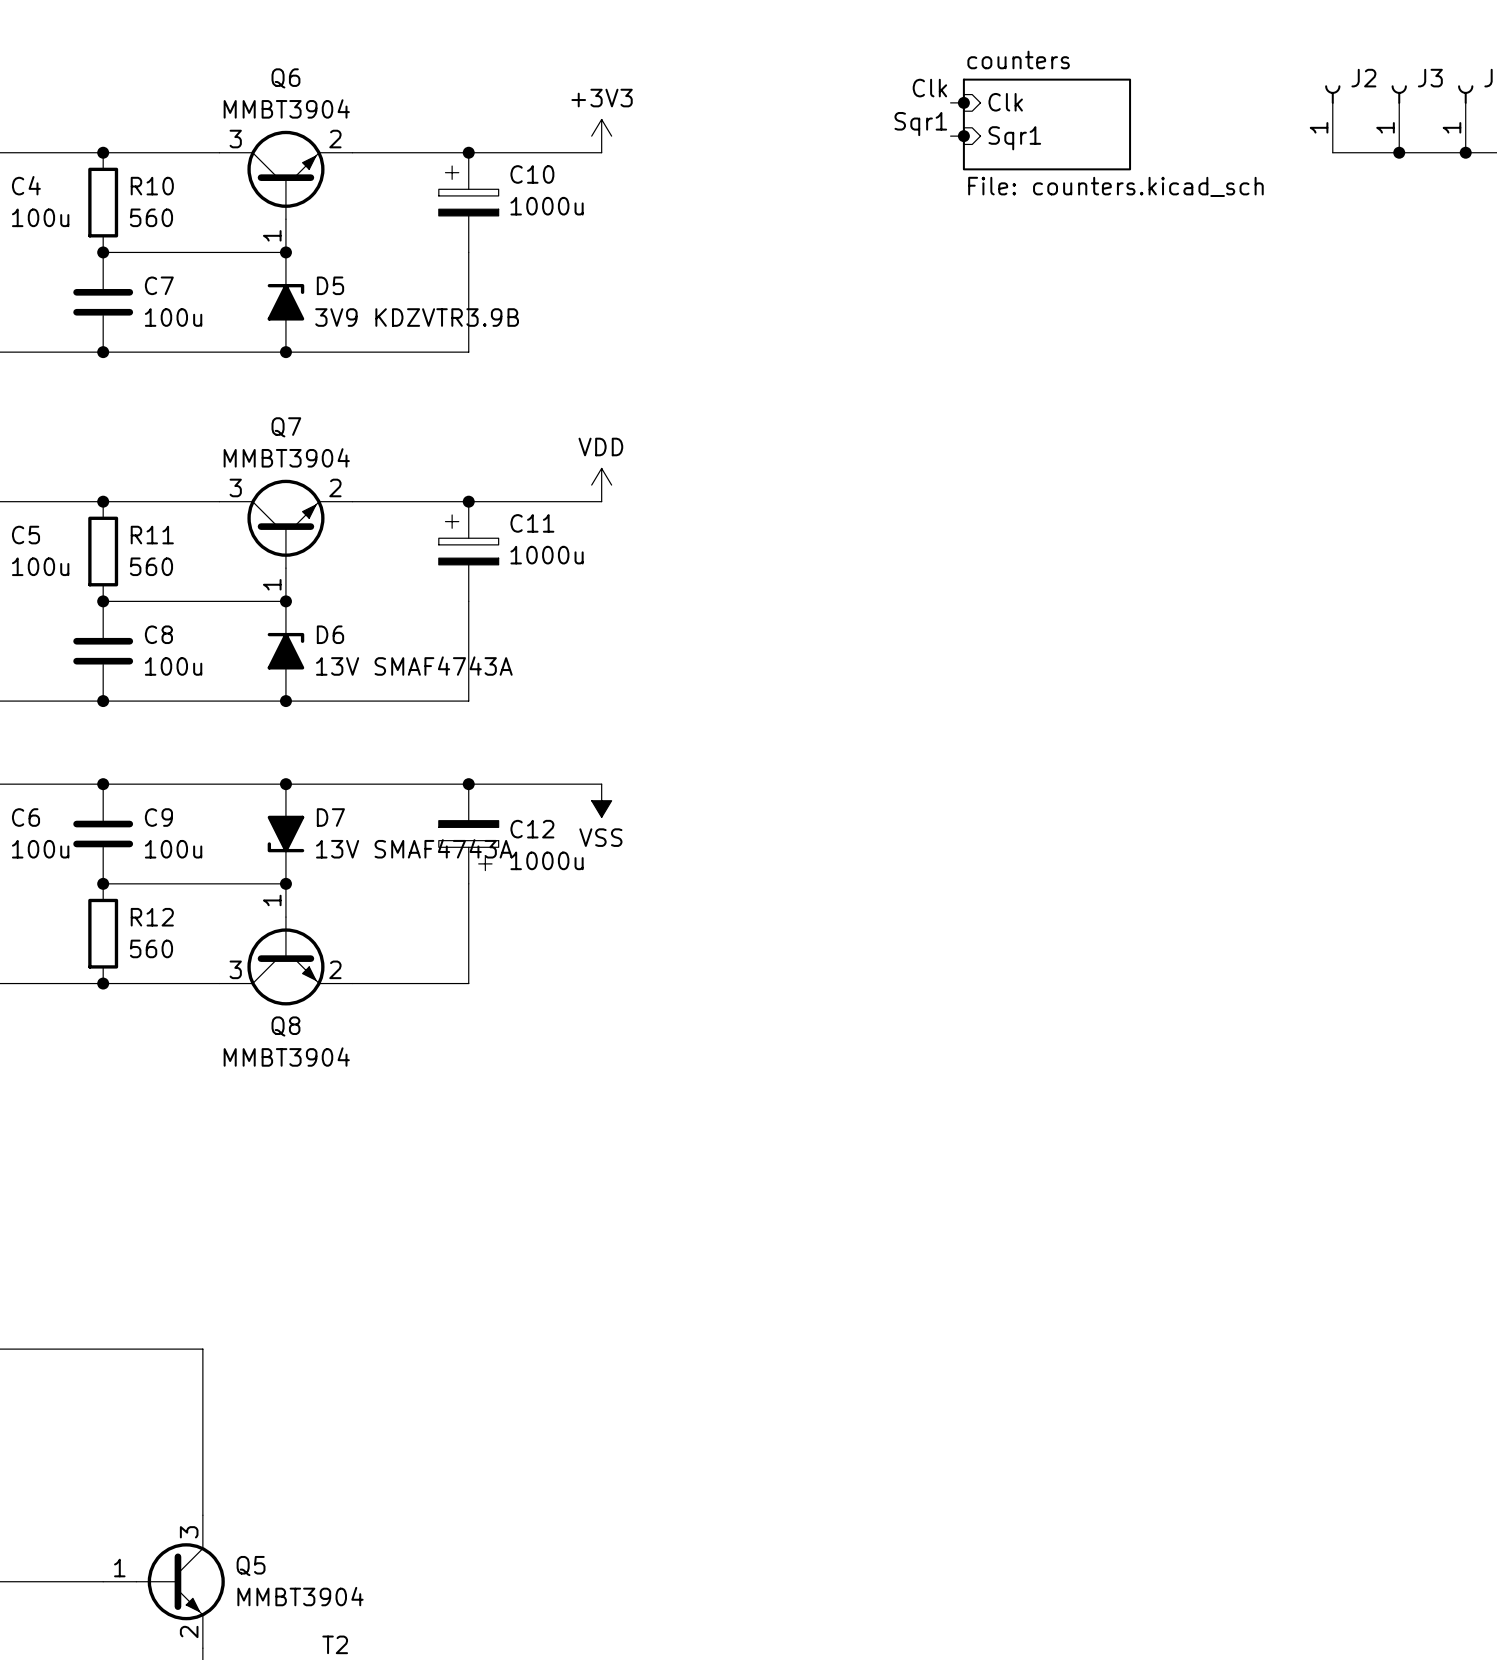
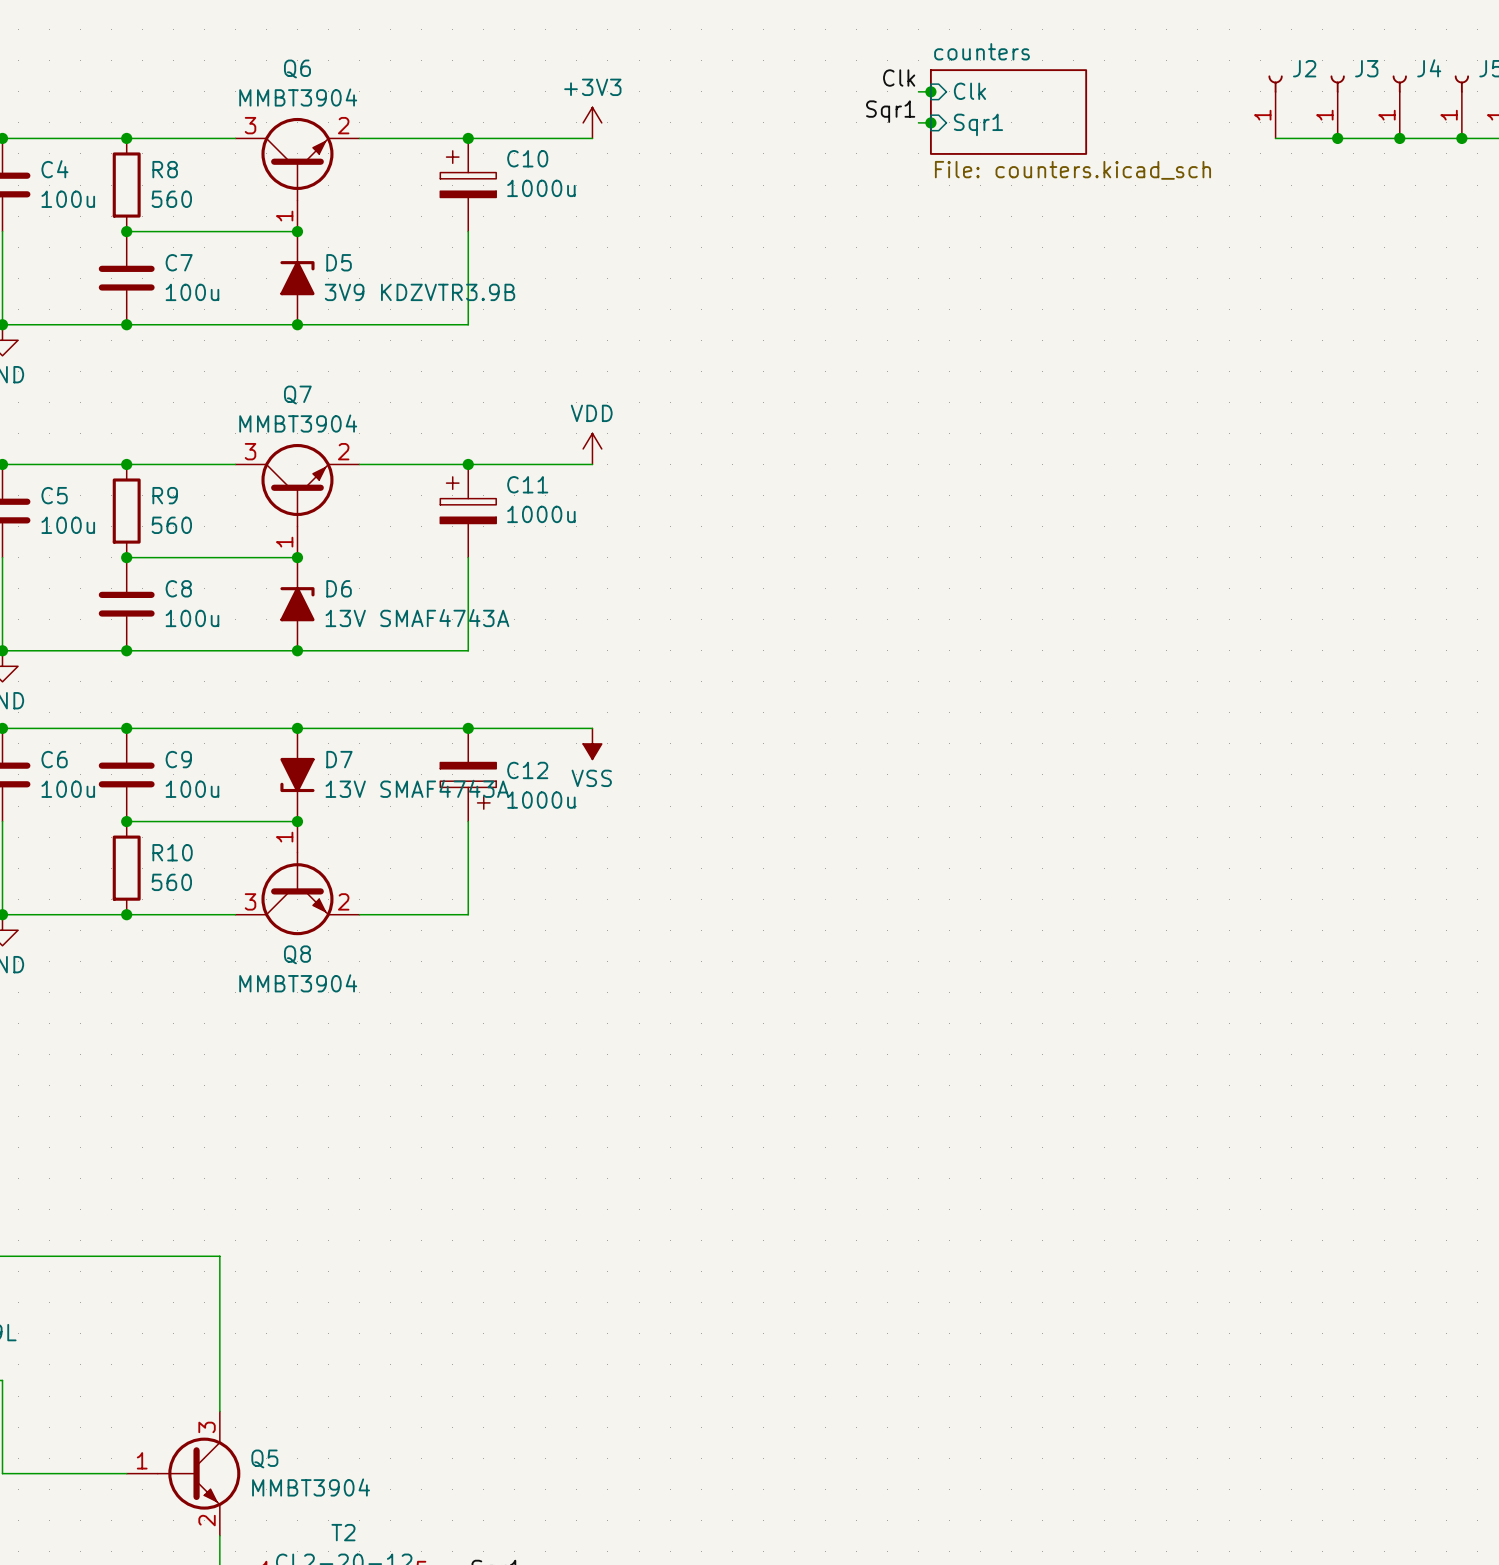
R10 name: R10 (152, 186) -> R8 (165, 169)
R11 name: R11 (152, 535) -> R9 (165, 495)
R12 name: R12 (152, 917) -> R10 (172, 852)

